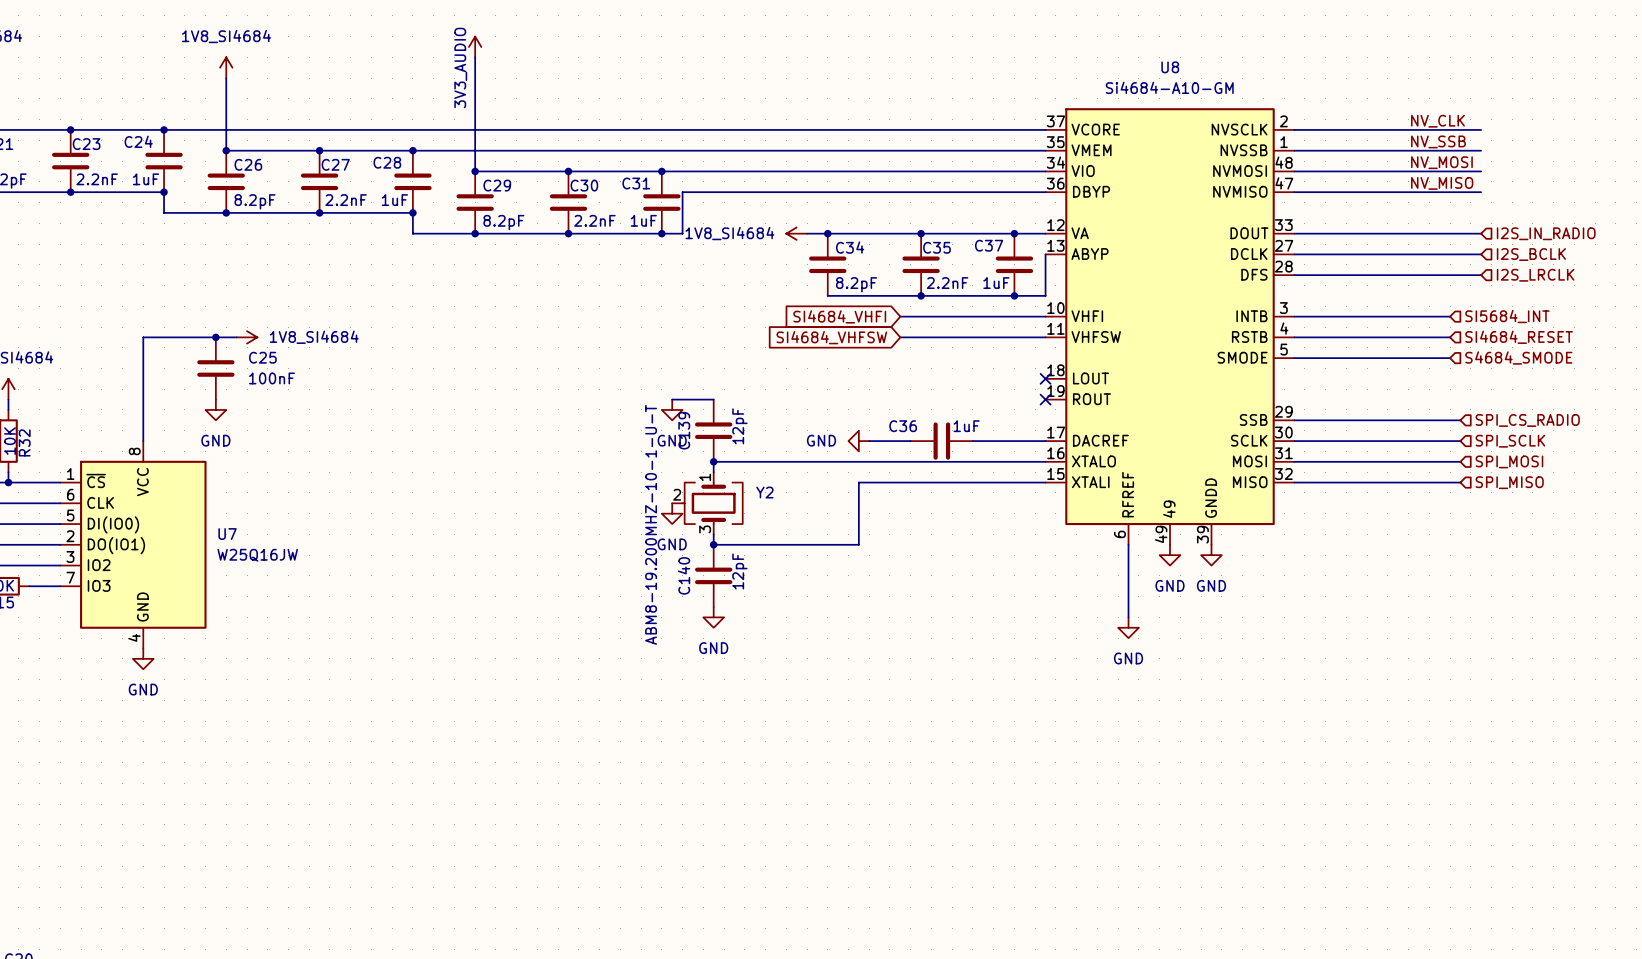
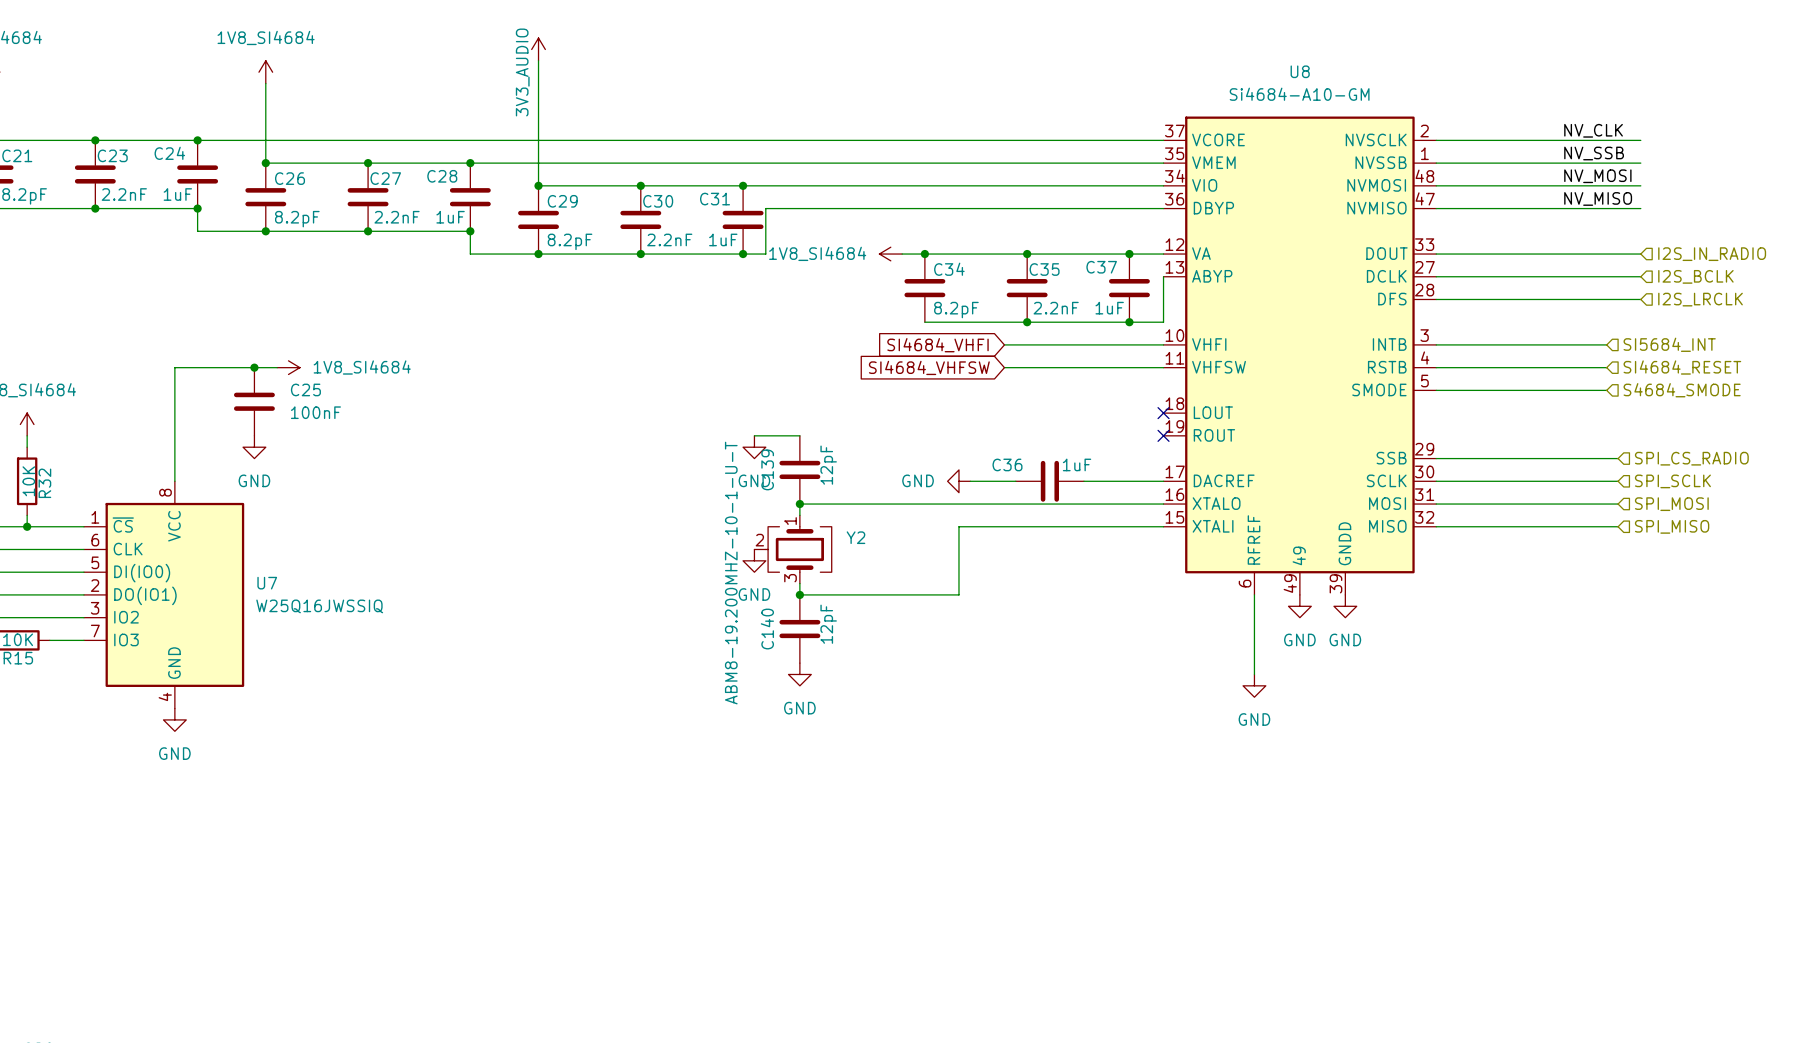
U7 value: W25Q16JW (257, 555) -> W25Q16JWSSIQ (319, 606)

